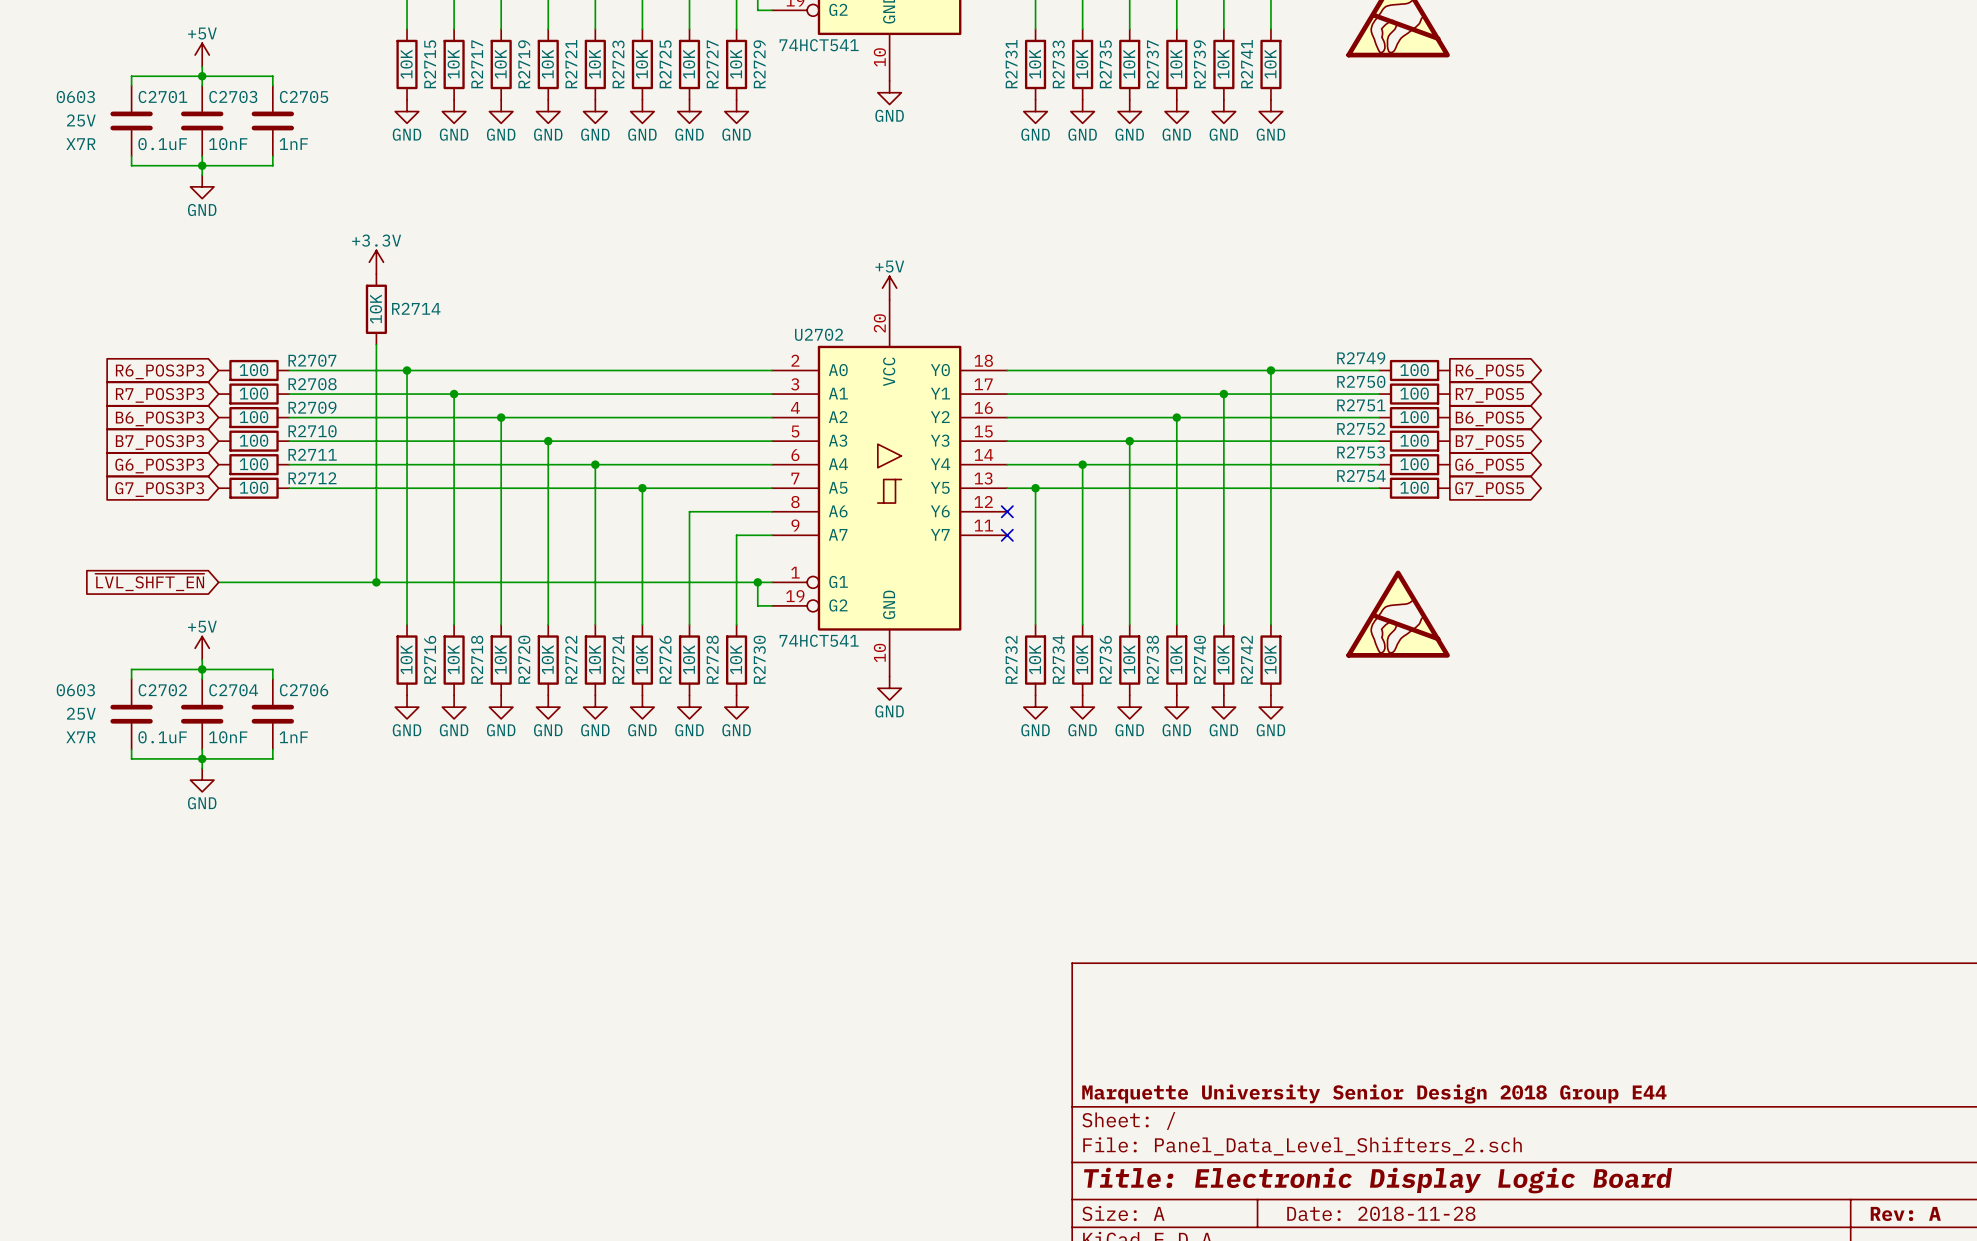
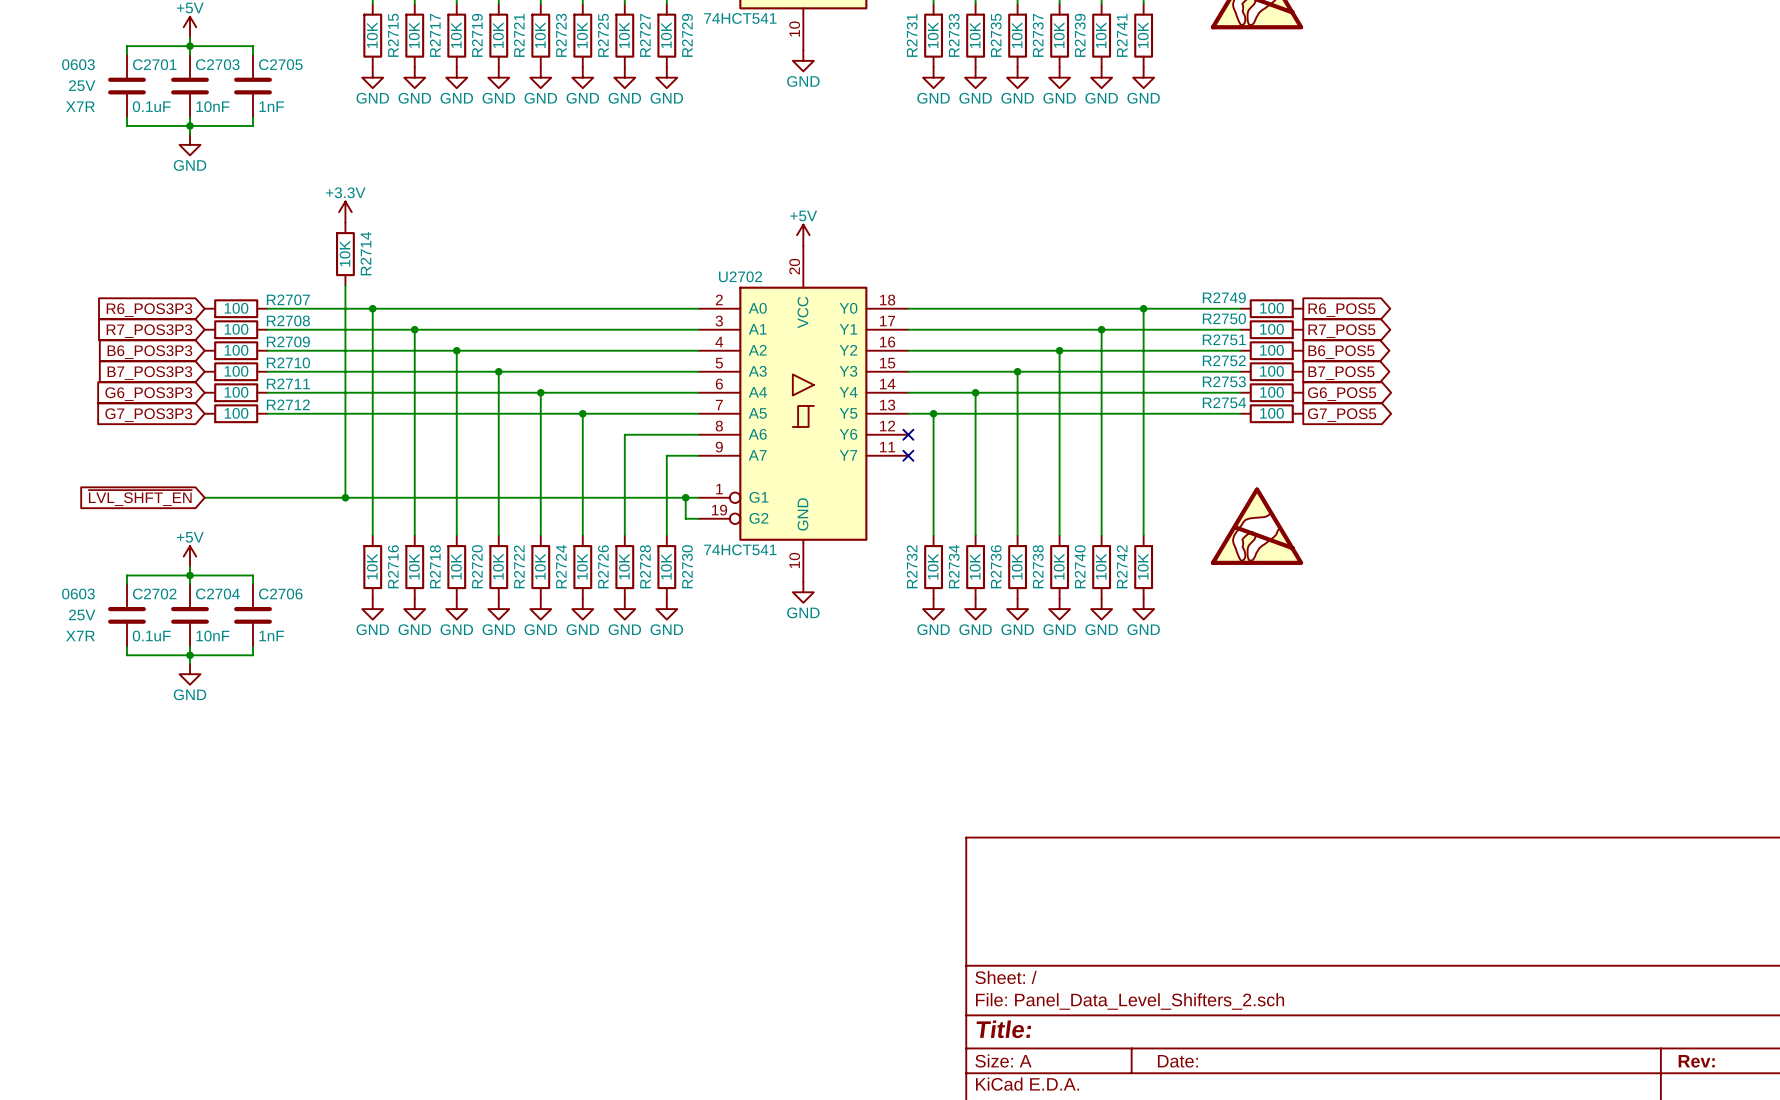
R2714 name rotation: 0° (416, 308) -> 90° counterclockwise (365, 253)
title block: Marquette University Senior Design 2018 Group E44 (1374, 1094) -> none
title block: Title: Electronic Display Logic Board (1377, 1180) -> Title: (1003, 1029)
title block: Date: 2018-11-28 (1381, 1213) -> Date: (1177, 1061)
title block: Rev: A (1905, 1213) -> Rev: (1696, 1061)

